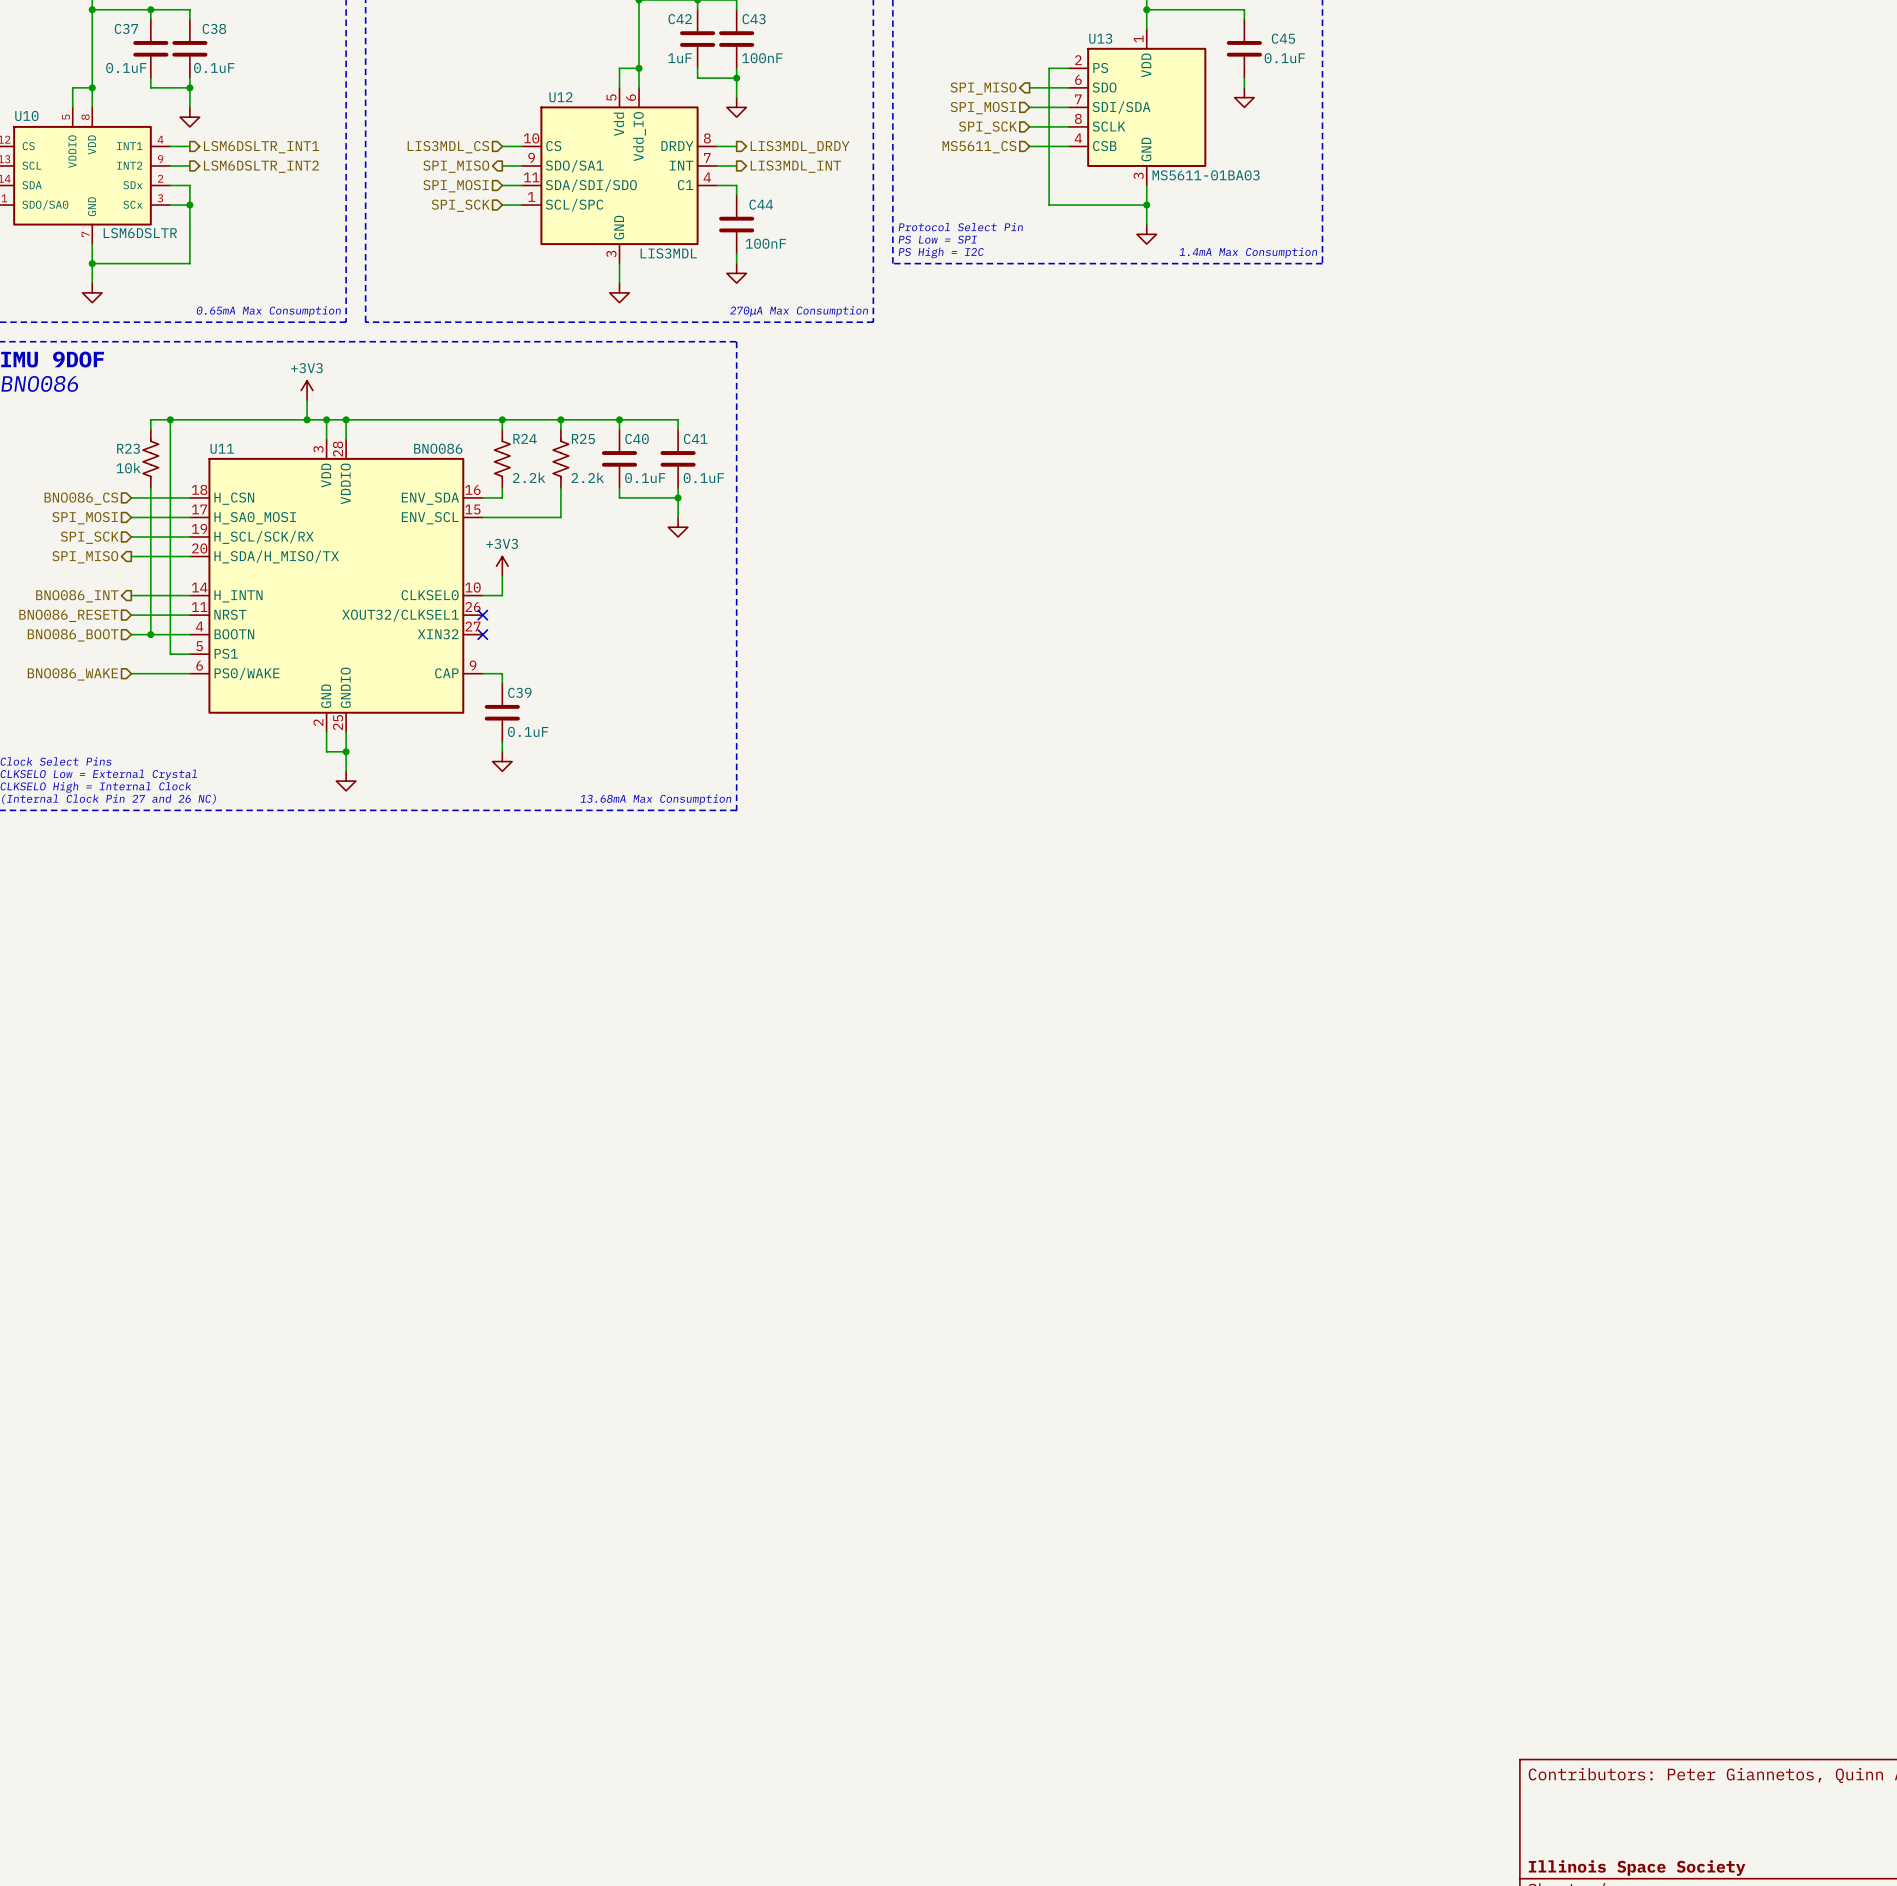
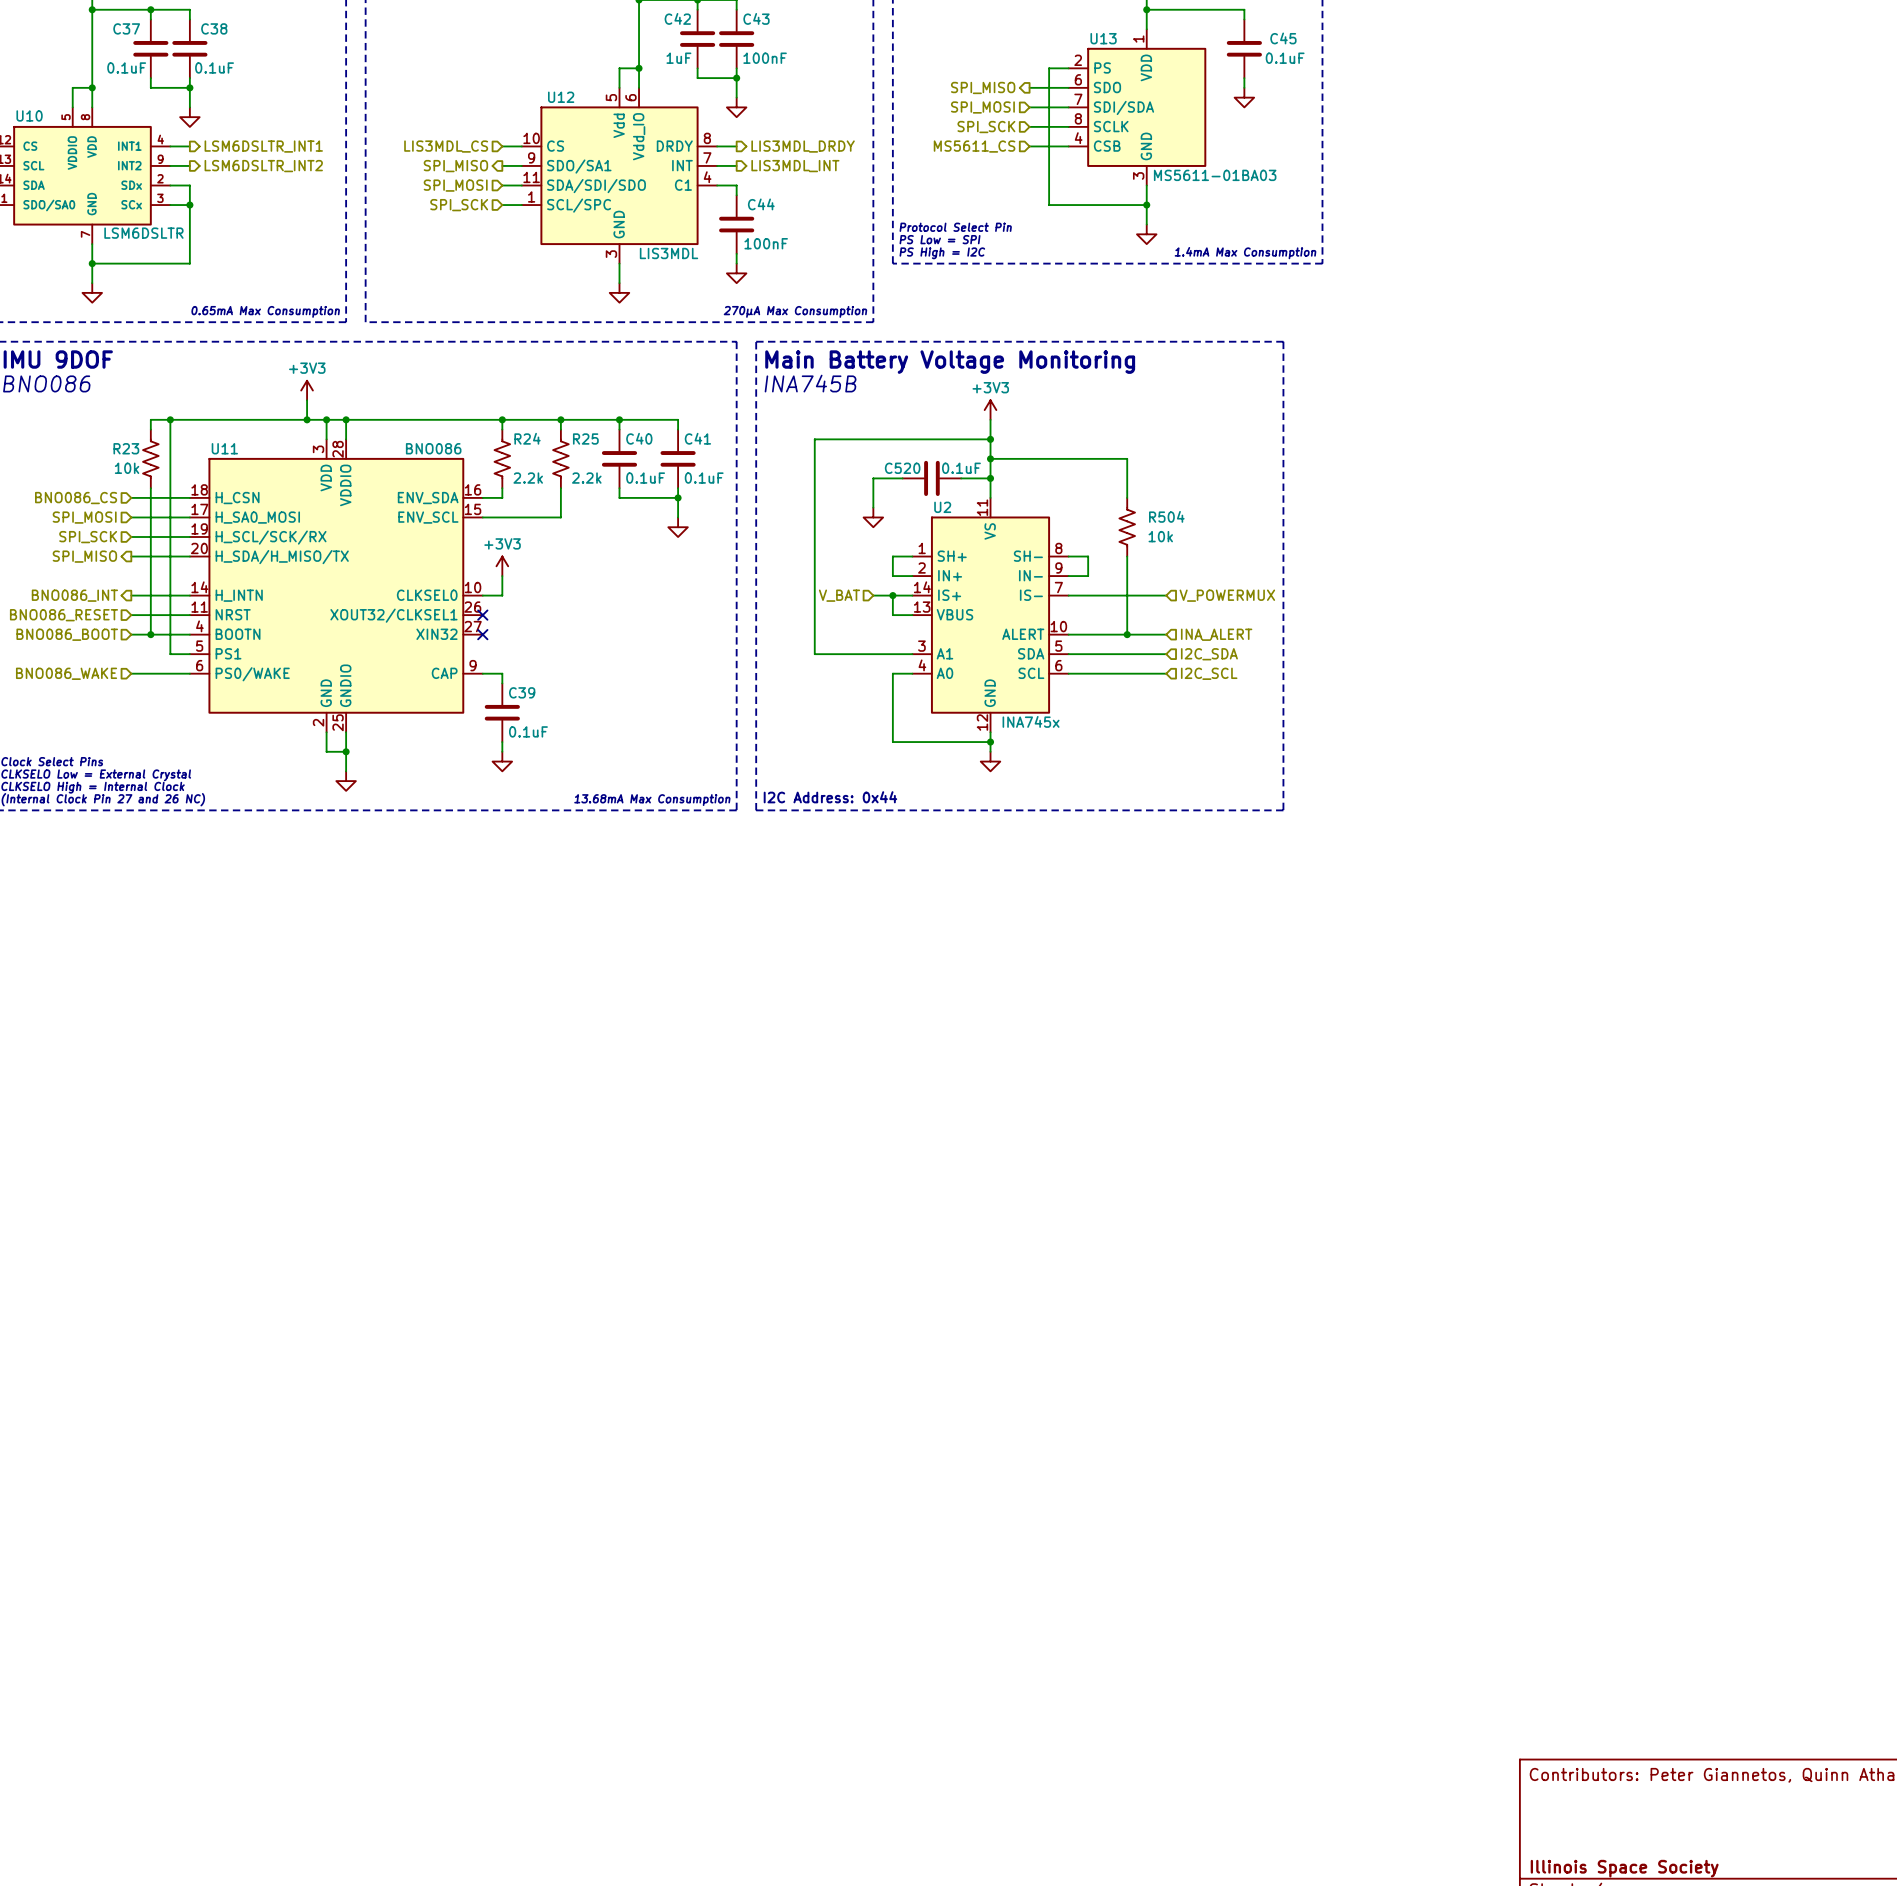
line: none -> (756, 341) (1283, 341) (1283, 810) (756, 810) (756, 341)
text: none -> Main Battery Voltage Monitoring (950, 362)
text: none -> INA745B (810, 383)
power symbol: none -> +3V3 (990, 410)
wire: none -> (990, 419) (990, 497)
wire: none -> (990, 439) (814, 439) (814, 654) (912, 654)
junction: none -> (990, 439)
wire: none -> (990, 458) (1127, 458) (1127, 497)
junction: none -> (990, 458)
wire: none -> (902, 478) (873, 478) (873, 507)
C520: none -> 0.1uF (931, 478)
wire: none -> (961, 478) (990, 478)
junction: none -> (990, 478)
power symbol: none -> (873, 517)
R504: none -> 10k (1127, 527)
wire: none -> (912, 556) (892, 556) (892, 576) (912, 576)
wire: none -> (1068, 556) (1088, 556) (1088, 576) (1068, 576)
wire: none -> (1127, 556) (1127, 634)
wire: none -> (873, 595) (912, 595)
wire: none -> (892, 595) (892, 615) (912, 615)
junction: none -> (892, 595)
wire: none -> (1068, 595) (1166, 595)
hierarchical label: none -> V_BAT (839, 595)
hierarchical label: none -> V_POWERMUX (1227, 595)
U2: none -> INA745x (990, 615)
wire: none -> (1068, 634) (1166, 634)
junction: none -> (1127, 634)
hierarchical label: none -> INA_ALERT (1216, 634)
wire: none -> (1068, 654) (1166, 654)
hierarchical label: none -> I2C_SDA (1209, 654)
wire: none -> (912, 673) (892, 673) (892, 742) (990, 742)
wire: none -> (1068, 673) (1166, 673)
hierarchical label: none -> I2C_SCL (1209, 673)
wire: none -> (990, 732) (990, 751)
junction: none -> (990, 742)
power symbol: none -> (990, 761)
text: none -> I2C Address: 0x44 (830, 797)

